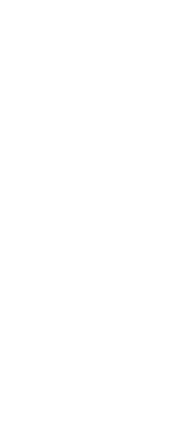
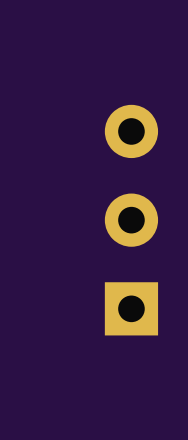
part: none -> (131, 220)

